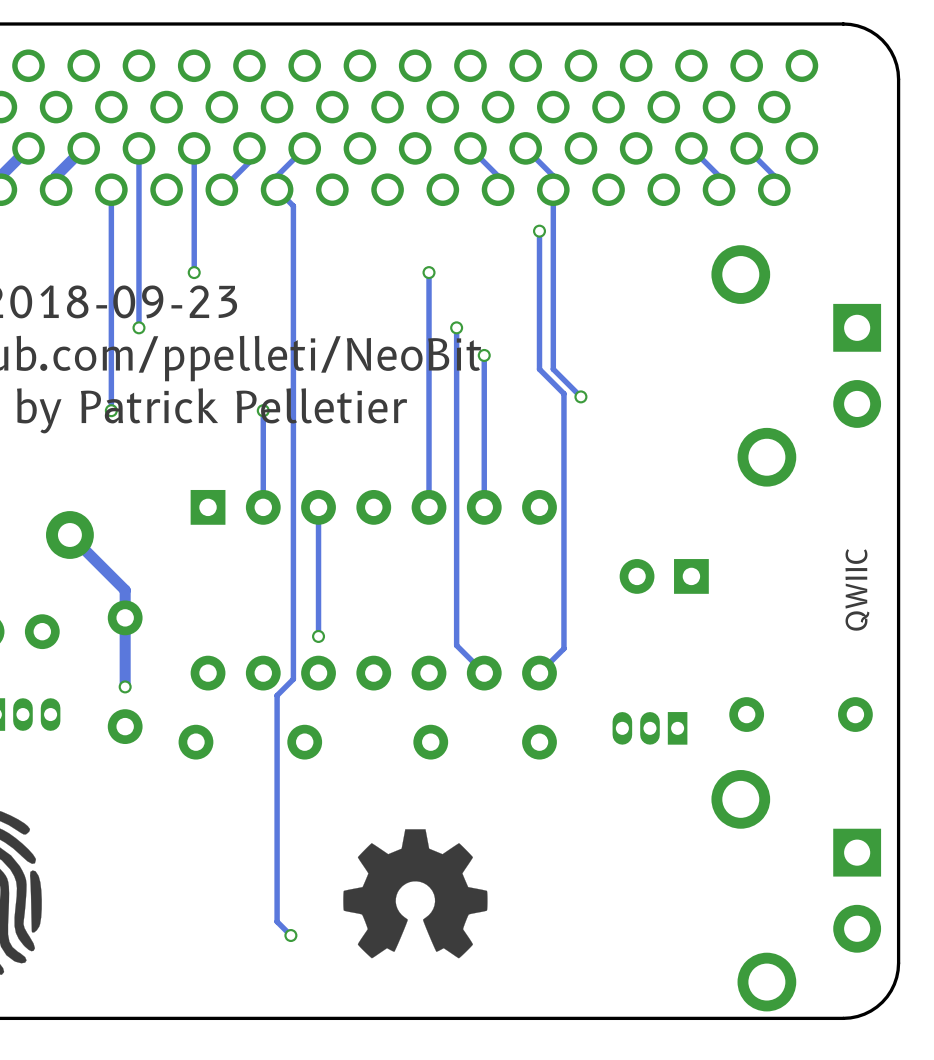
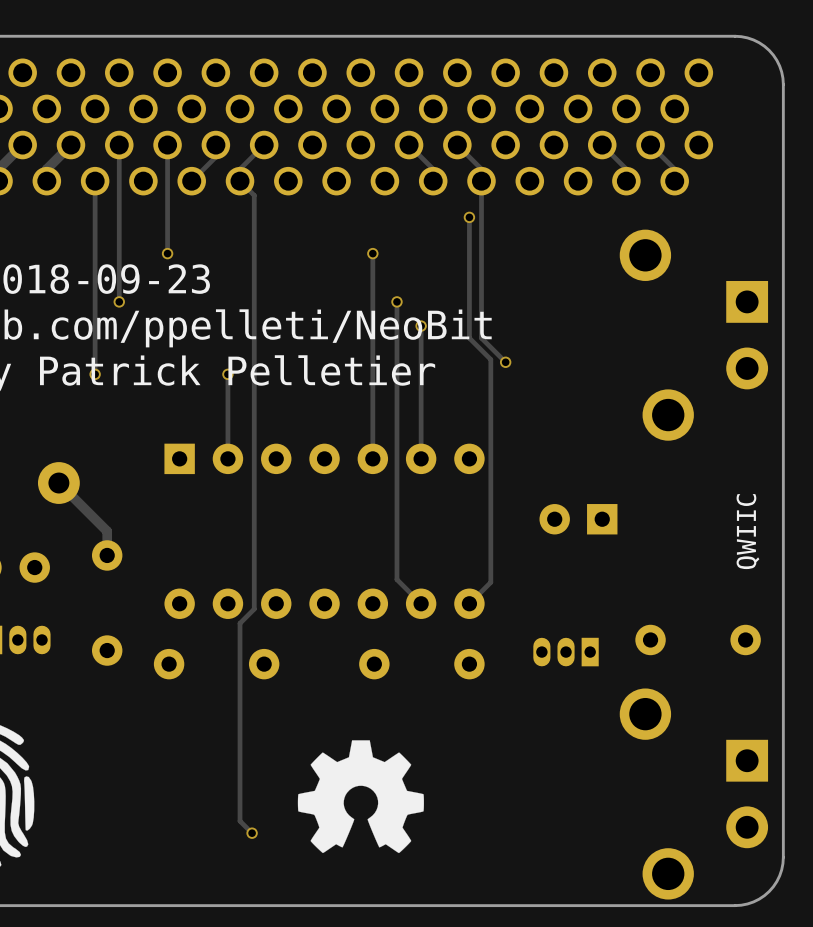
track: (318, 507) (318, 636) -> none
track: (125, 617) (125, 686) -> none
via: (318, 636) -> none
via: (125, 686) -> none

